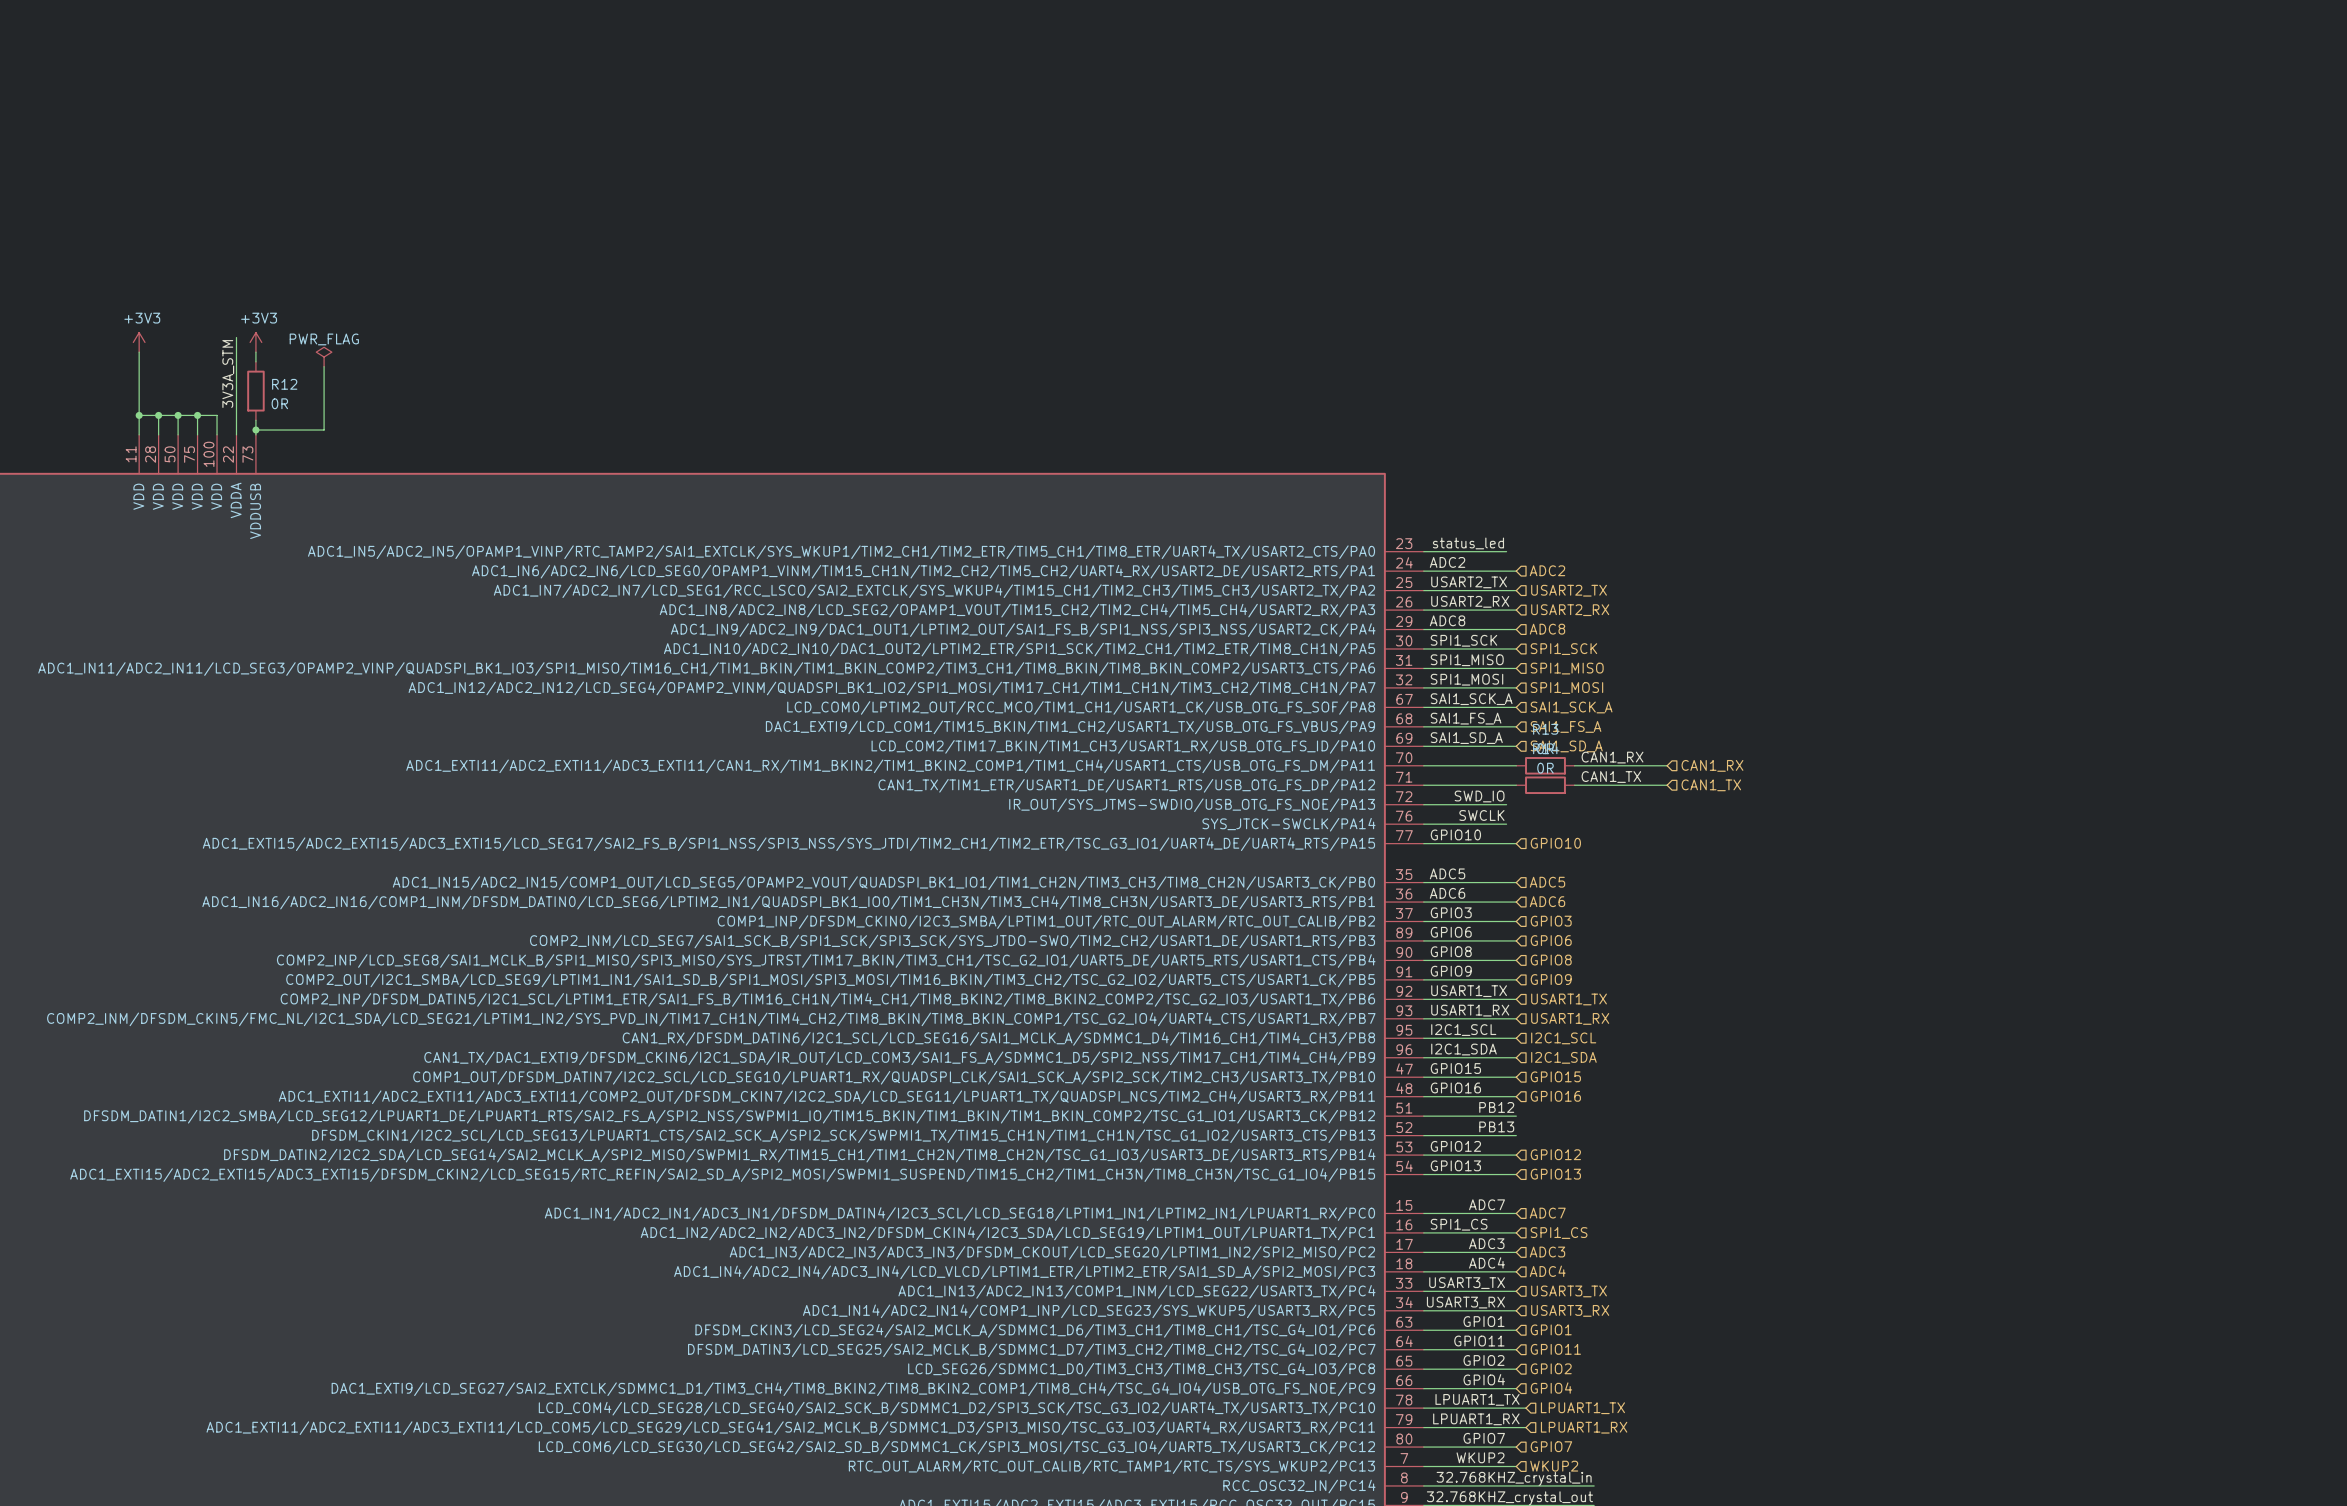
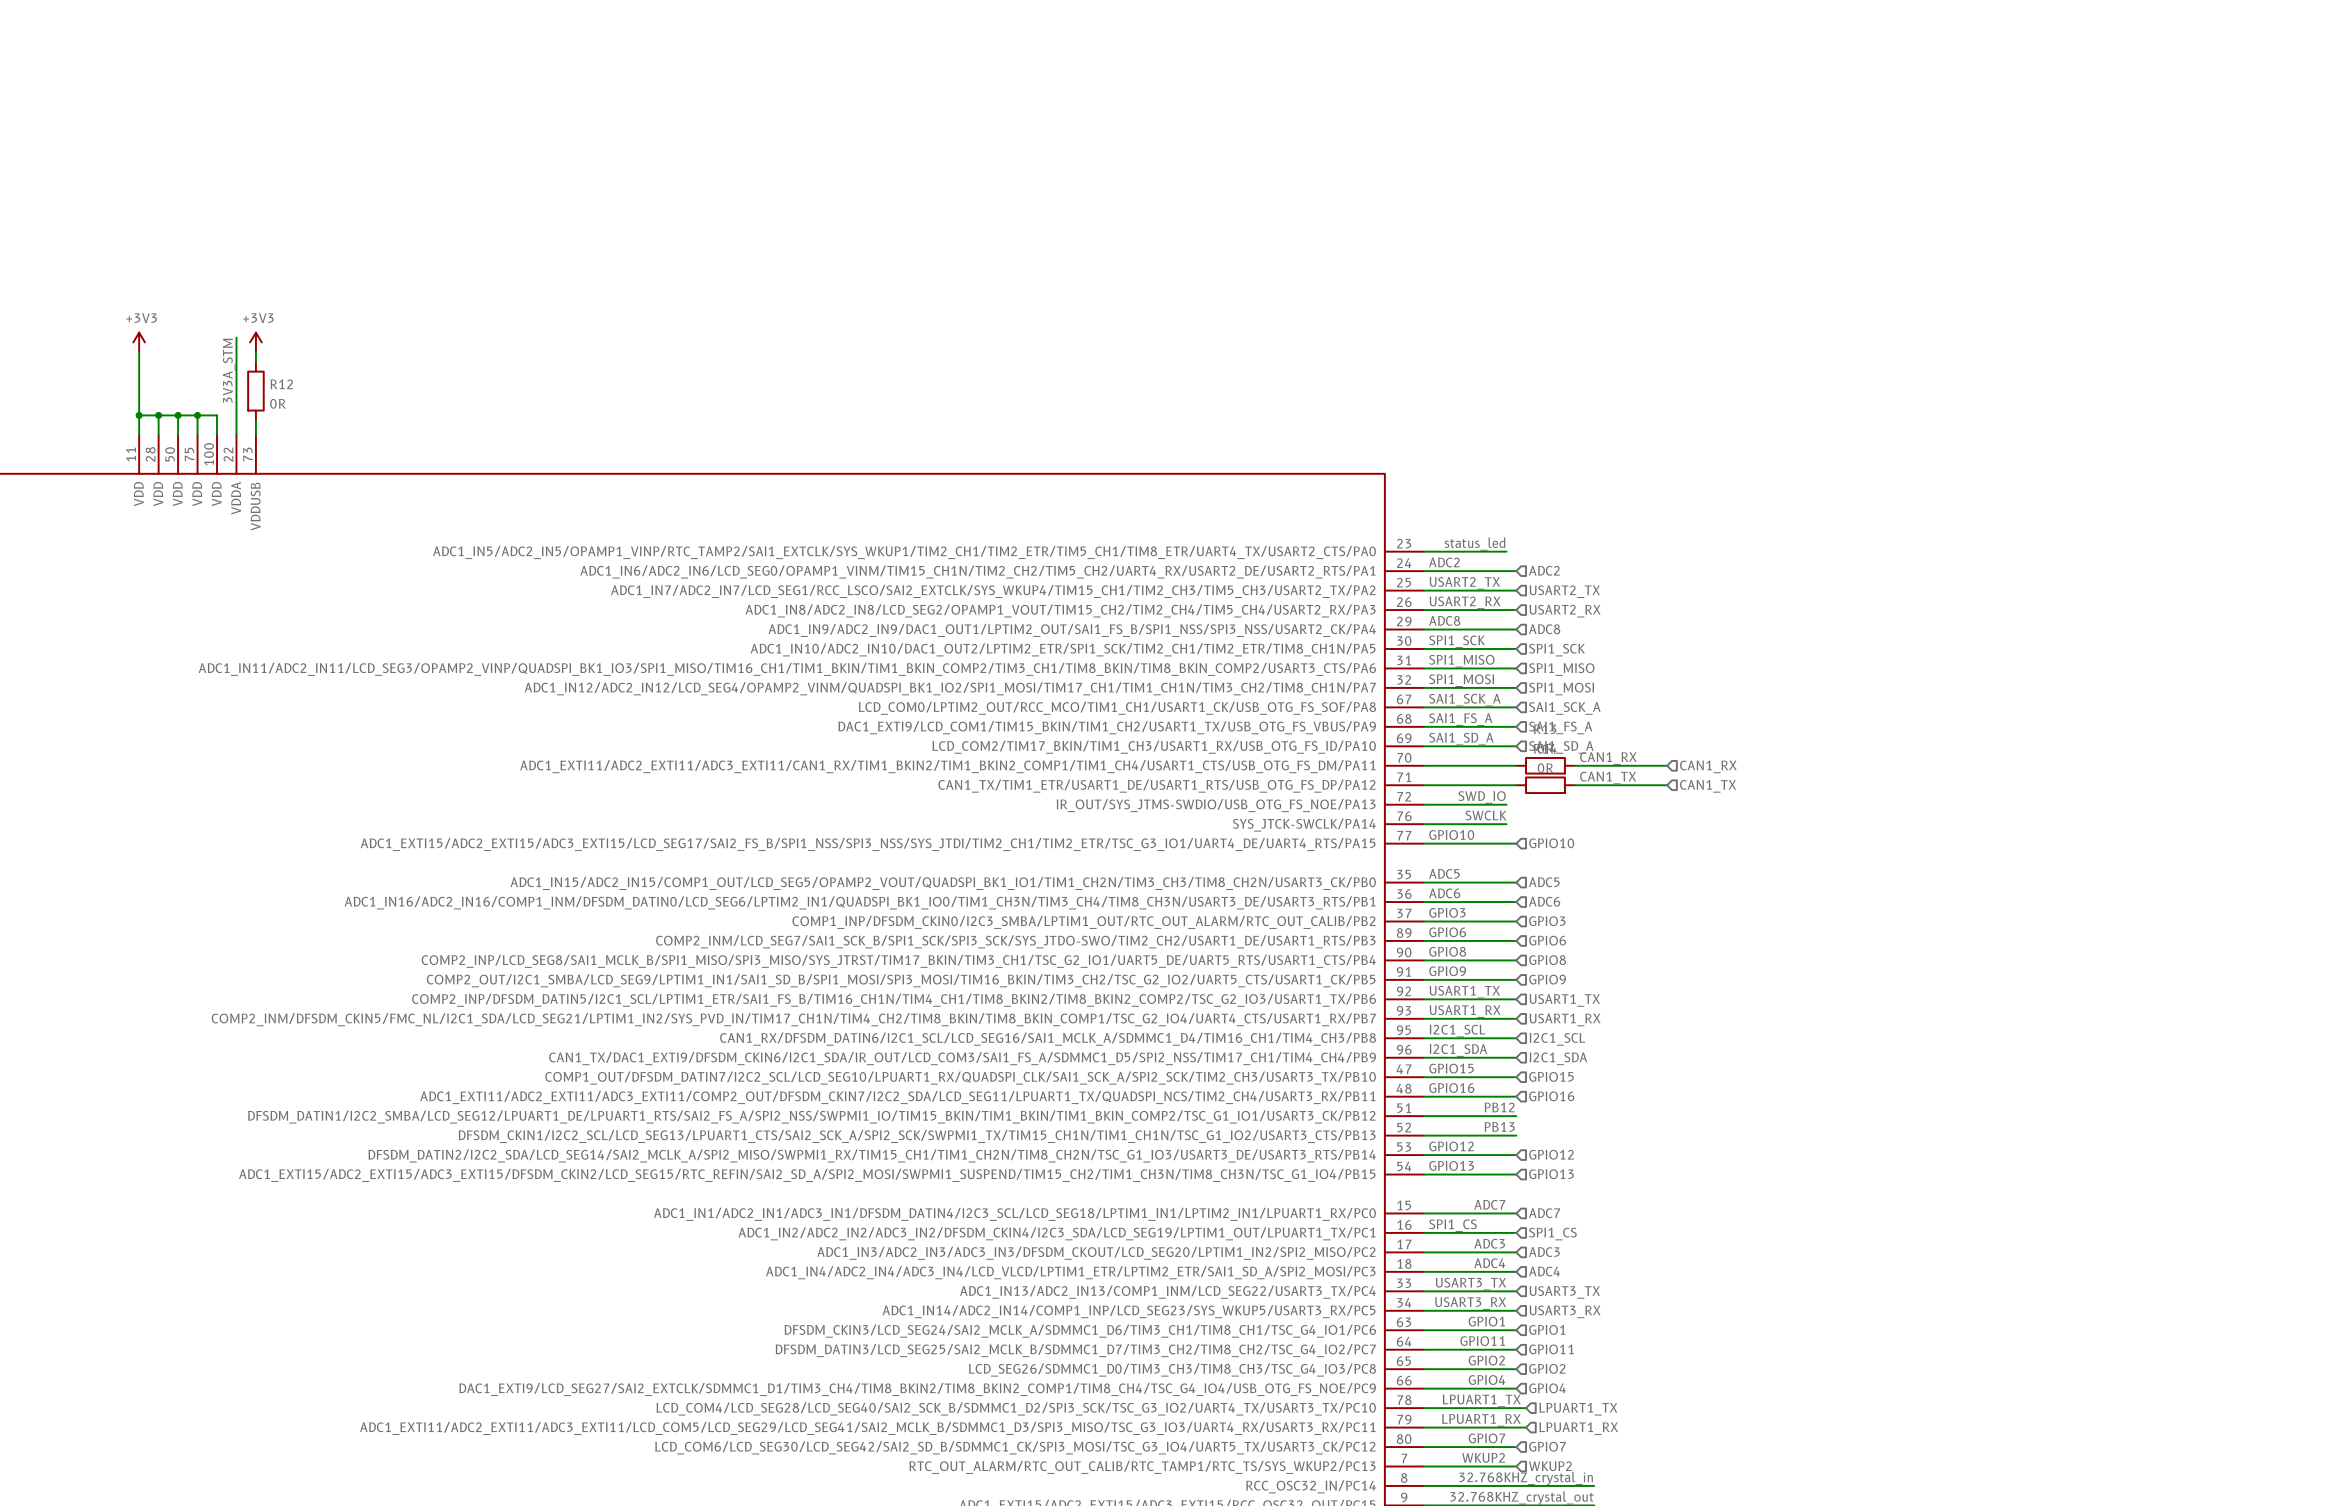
power symbol: PWR_FLAG (324, 357) -> none
wire: (324, 366) (324, 430) (255, 430) -> none
junction: (255, 430) -> none

